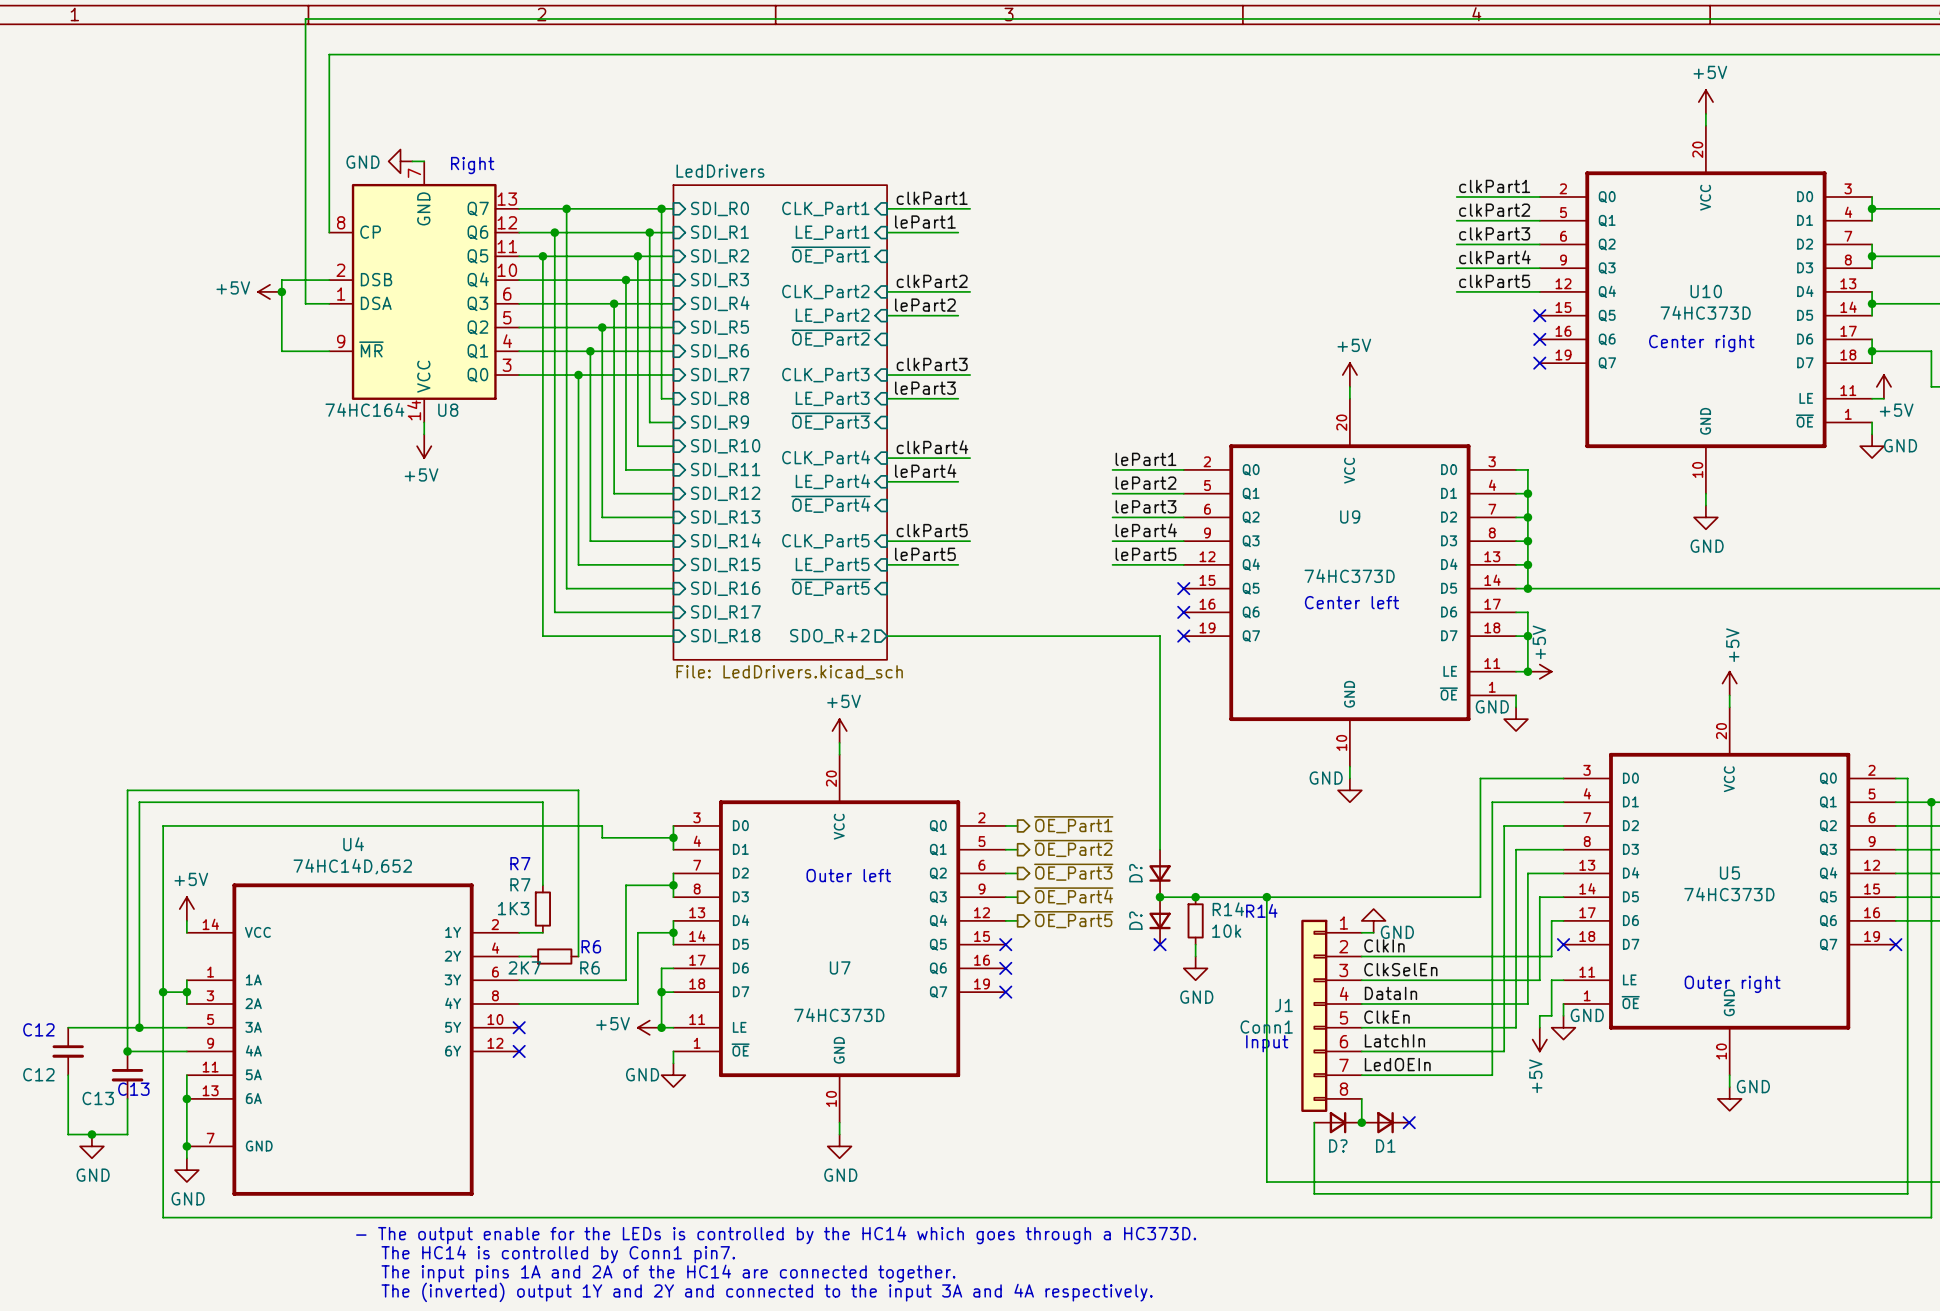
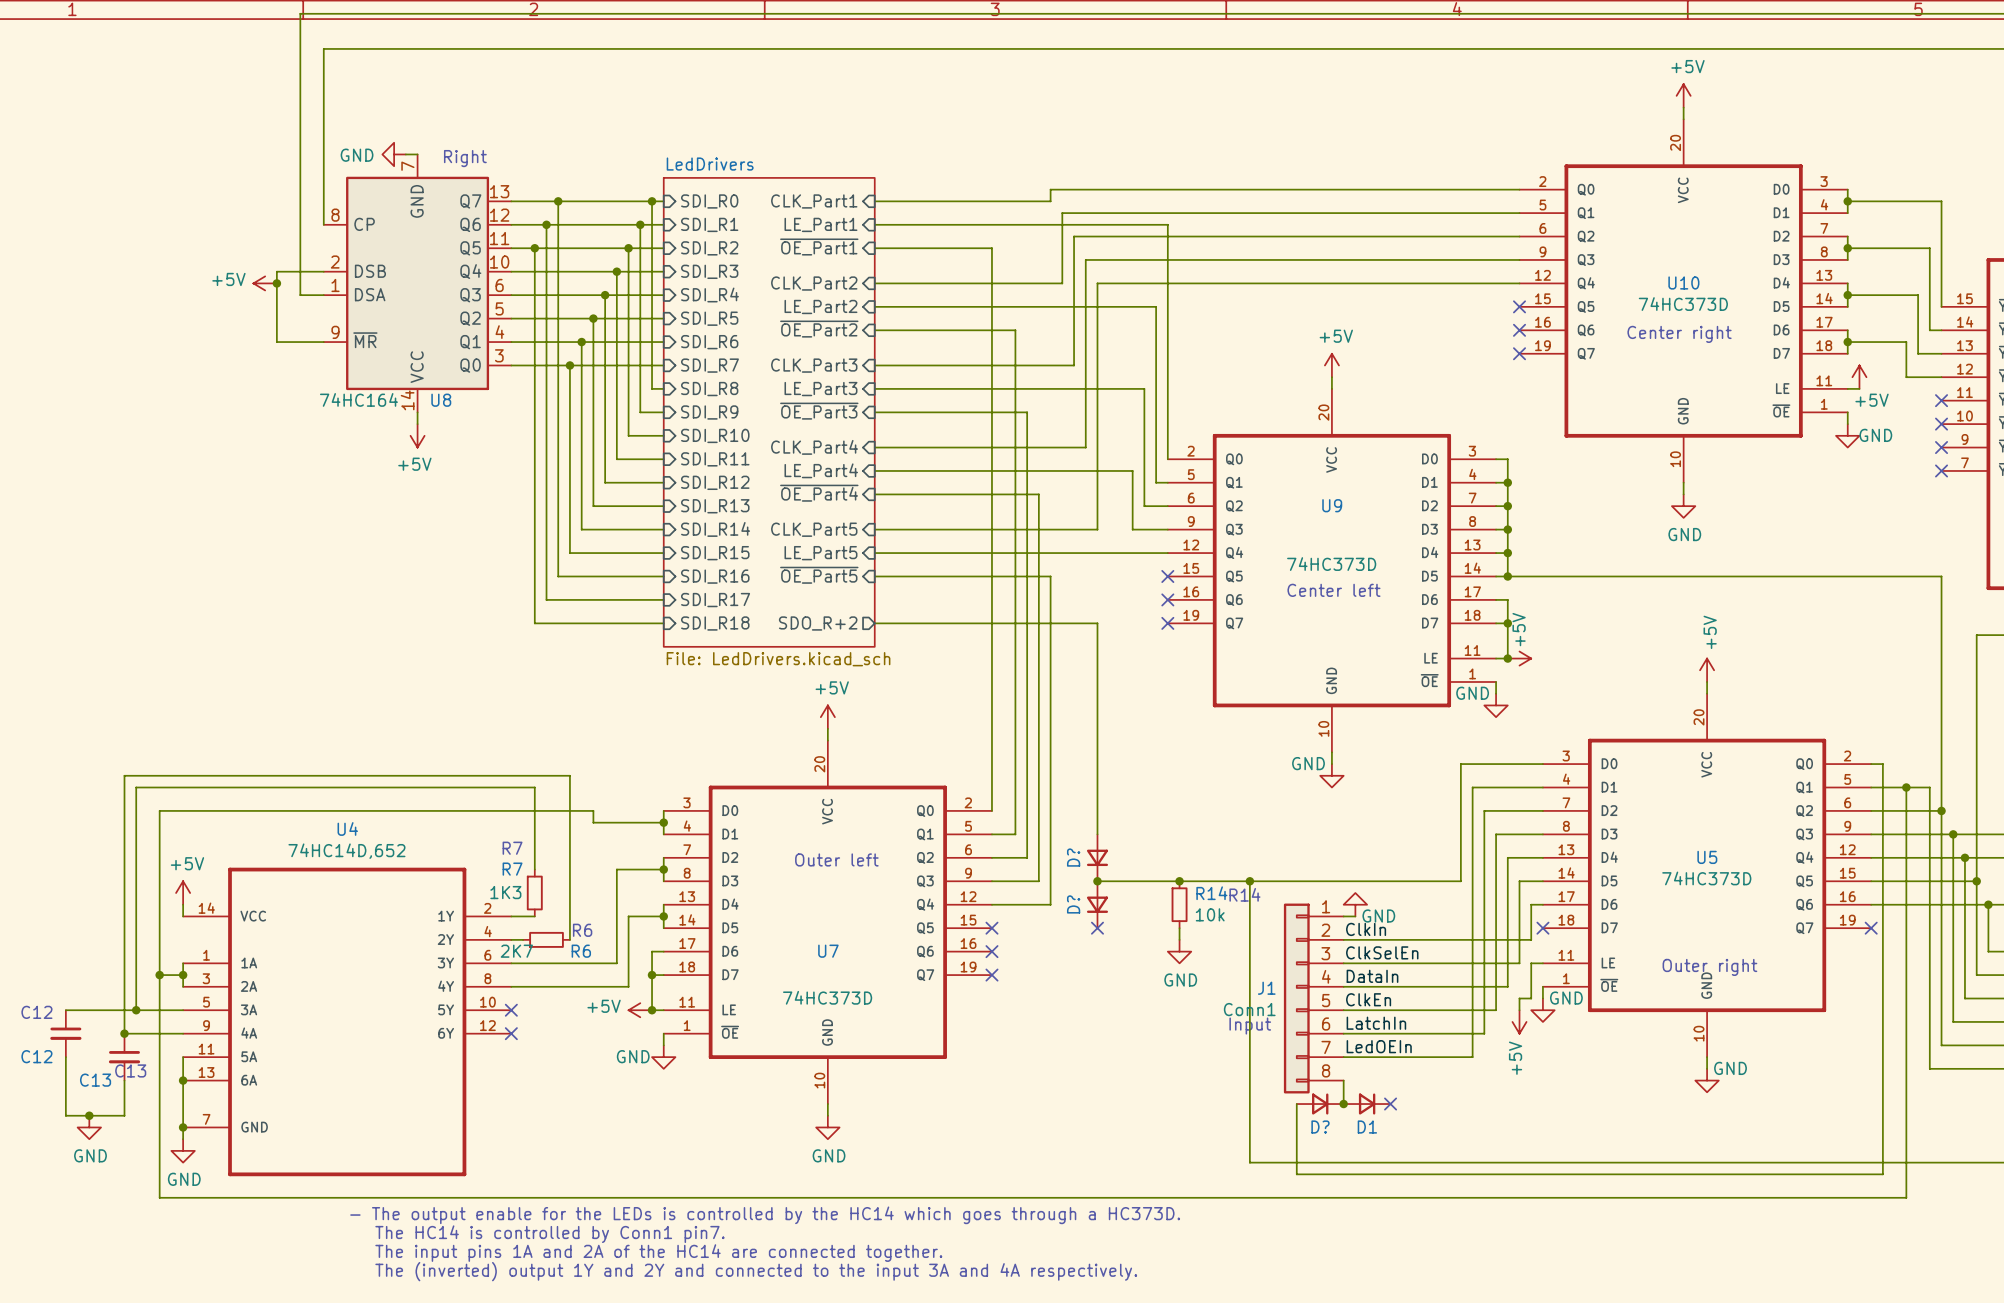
label: clkPart1 (1494, 186) -> none
wire: none -> (1437, 189) (1050, 189) (1050, 201) (956, 201)
label: clkPart1 (932, 198) -> none
label: clkPart2 (1494, 210) -> none
wire: none -> (1437, 213) (1062, 213) (1062, 283) (956, 283)
label: lePart1 (925, 222) -> none
label: clkPart3 (1494, 233) -> none
wire: none -> (1437, 236) (1074, 236) (1074, 365) (956, 365)
label: clkPart4 (1494, 257) -> none
wire: none -> (1437, 259) (1085, 259) (1085, 447) (956, 447)
label: clkPart2 (932, 281) -> none
label: clkPart5 (1494, 281) -> none
wire: none -> (1437, 283) (1097, 283) (1097, 529) (956, 529)
label: lePart2 (925, 305) -> none
wire: none -> (874, 330) (1015, 330) (1015, 834) (1003, 834)
label: clkPart3 (932, 364) -> none
label: lePart3 (925, 388) -> none
wire: none -> (874, 412) (1027, 412) (1027, 857) (1003, 857)
label: clkPart4 (932, 447) -> none
label: lePart1 (1145, 459) -> none
wire: (1112, 469) (1183, 469) -> (945, 224) (1167, 224) (1167, 459)
label: lePart4 (925, 470) -> none
label: lePart2 (1145, 483) -> none
wire: (1112, 493) (1171, 493) -> (945, 306) (1156, 306) (1156, 482)
wire: none -> (874, 494) (1038, 494) (1038, 881) (1003, 881)
label: lePart3 (1145, 506) -> none
wire: (1112, 517) (1160, 517) -> (945, 388) (1144, 388) (1144, 506)
label: clkPart5 (932, 530) -> none
label: lePart4 (1146, 530) -> none
wire: (1112, 541) (1148, 541) -> (945, 470) (1132, 470) (1132, 529)
label: lePart5 (925, 554) -> none
label: lePart5 (1145, 554) -> none
wire: none -> (945, 553) (1097, 553)
wire: none -> (874, 576) (1050, 576) (1050, 904) (1003, 904)
wire: (1112, 636) (1160, 636) (1160, 849) -> (1097, 623) (1097, 834)
hierarchical label: ~{OE_Part1} (1073, 824) -> none
wire: (1005, 825) (1017, 825) -> (991, 810) (991, 248) (874, 248)
hierarchical label: ~{OE_Part2} (1073, 848) -> none
hierarchical label: ~{OE_Part3} (1073, 872) -> none
D?: none -> (1097, 857)
D?: (1160, 873) -> none
hierarchical label: ~{OE_Part4} (1073, 895) -> none
wire: none -> (1097, 881) (1144, 881)
junction position: (1160, 897) -> (1097, 881)
hierarchical label: ~{OE_Part5} (1073, 919) -> none
D?: none -> (1097, 904)
D?: (1160, 920) -> none
no-connect mark position: (1160, 944) -> (1097, 928)

